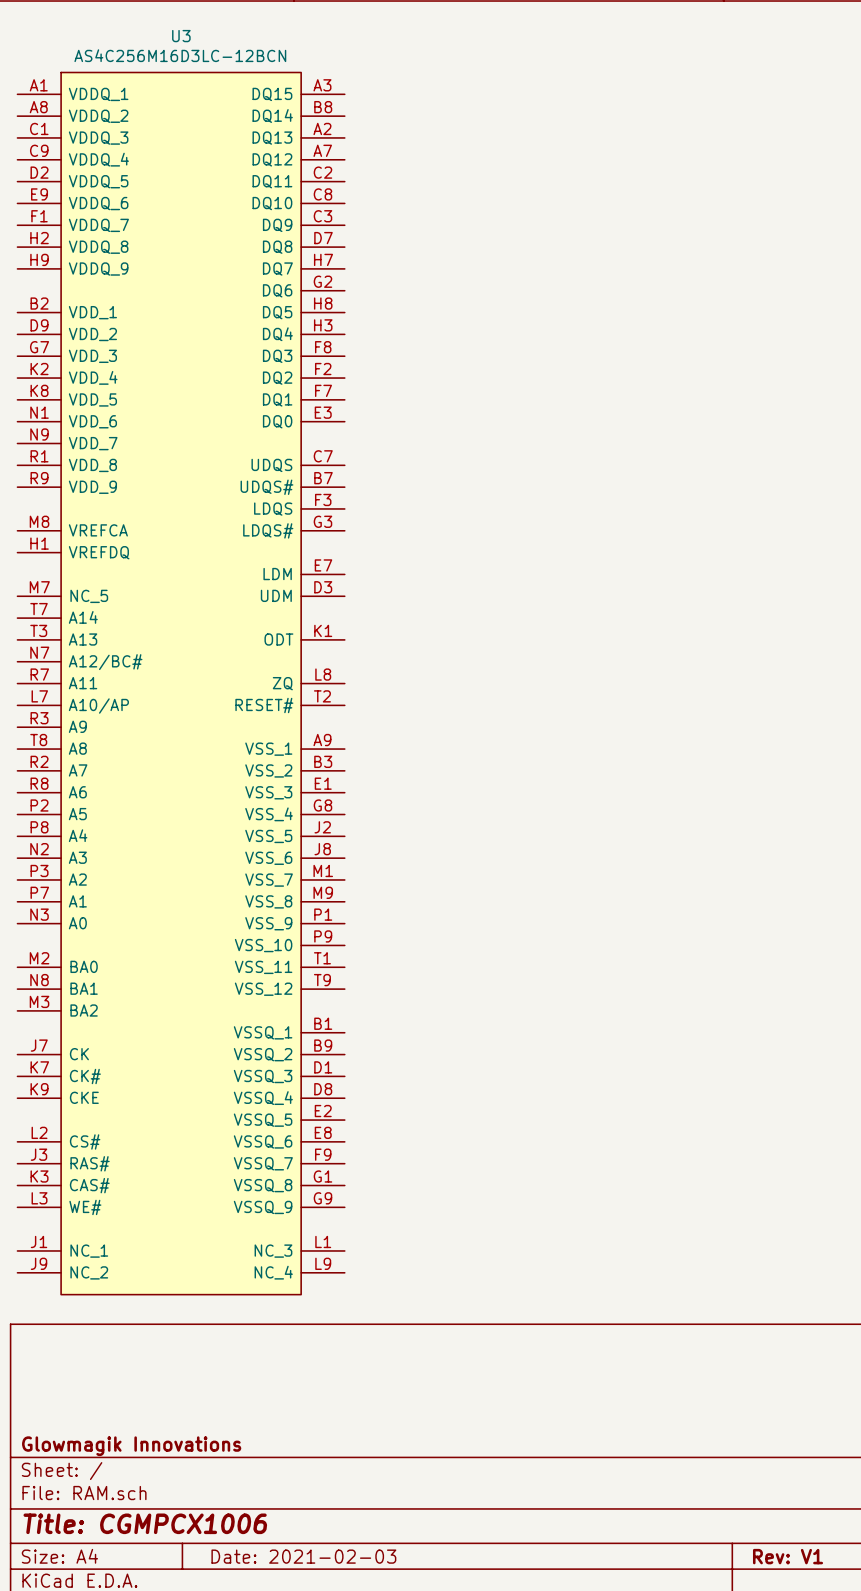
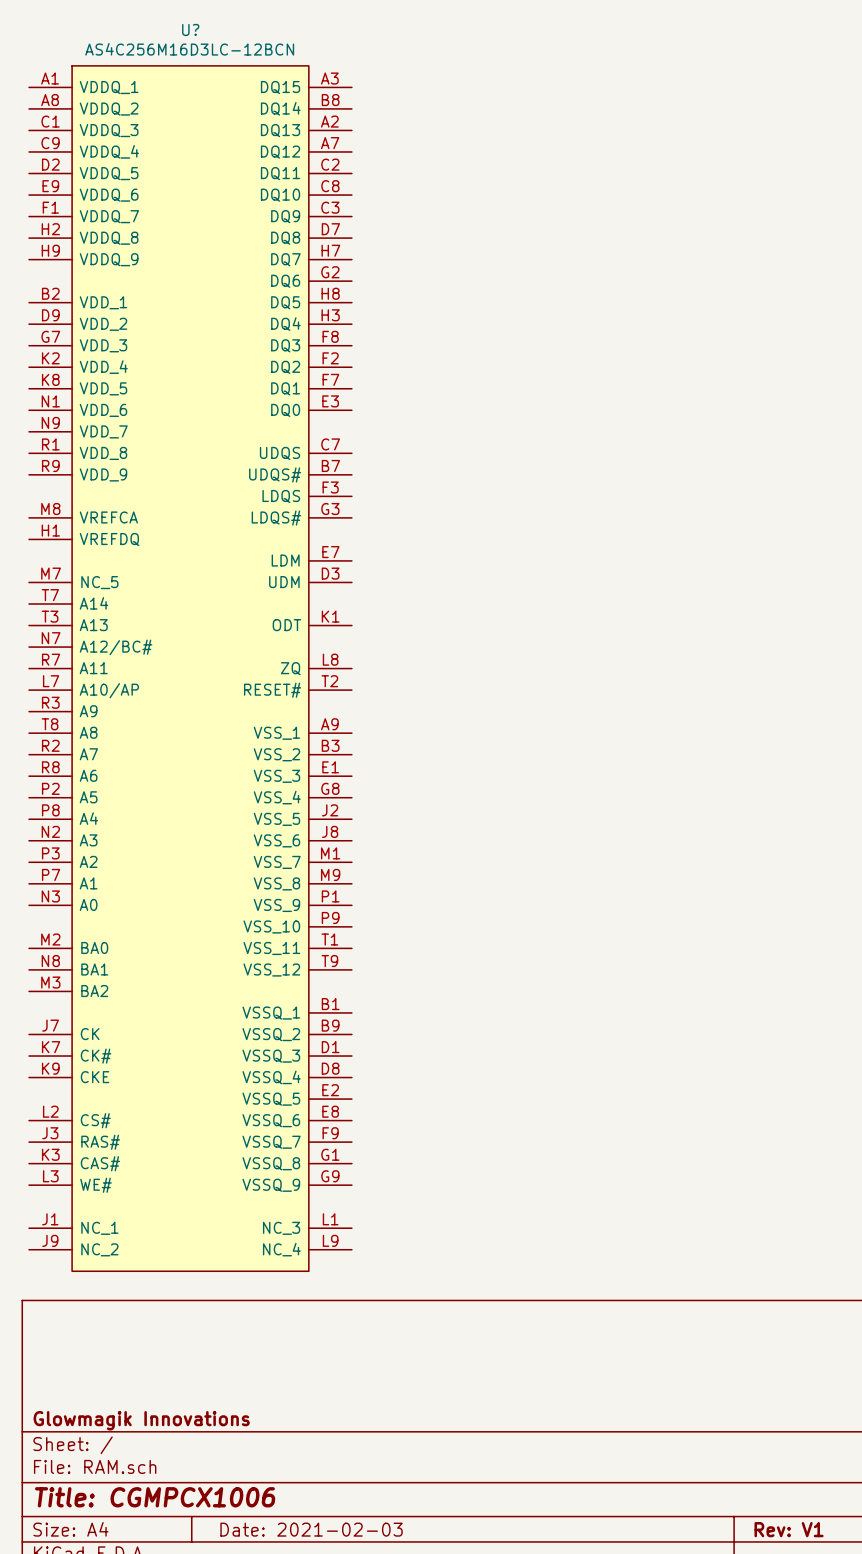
U3 name: U3 (181, 36) -> U? (190, 29)

